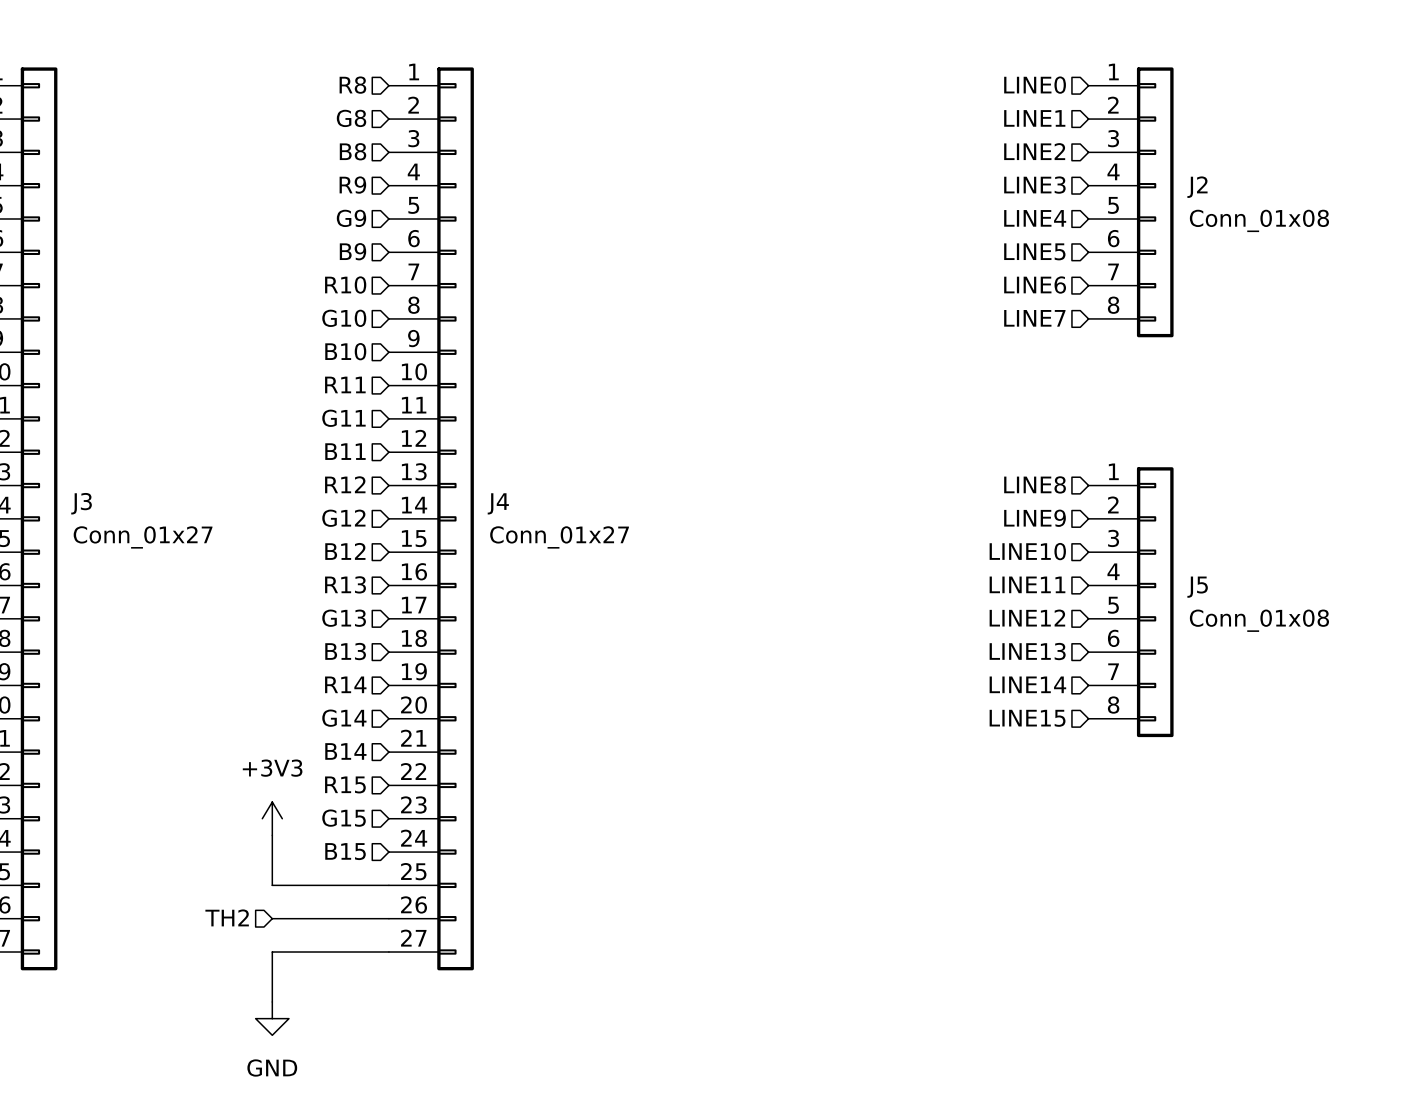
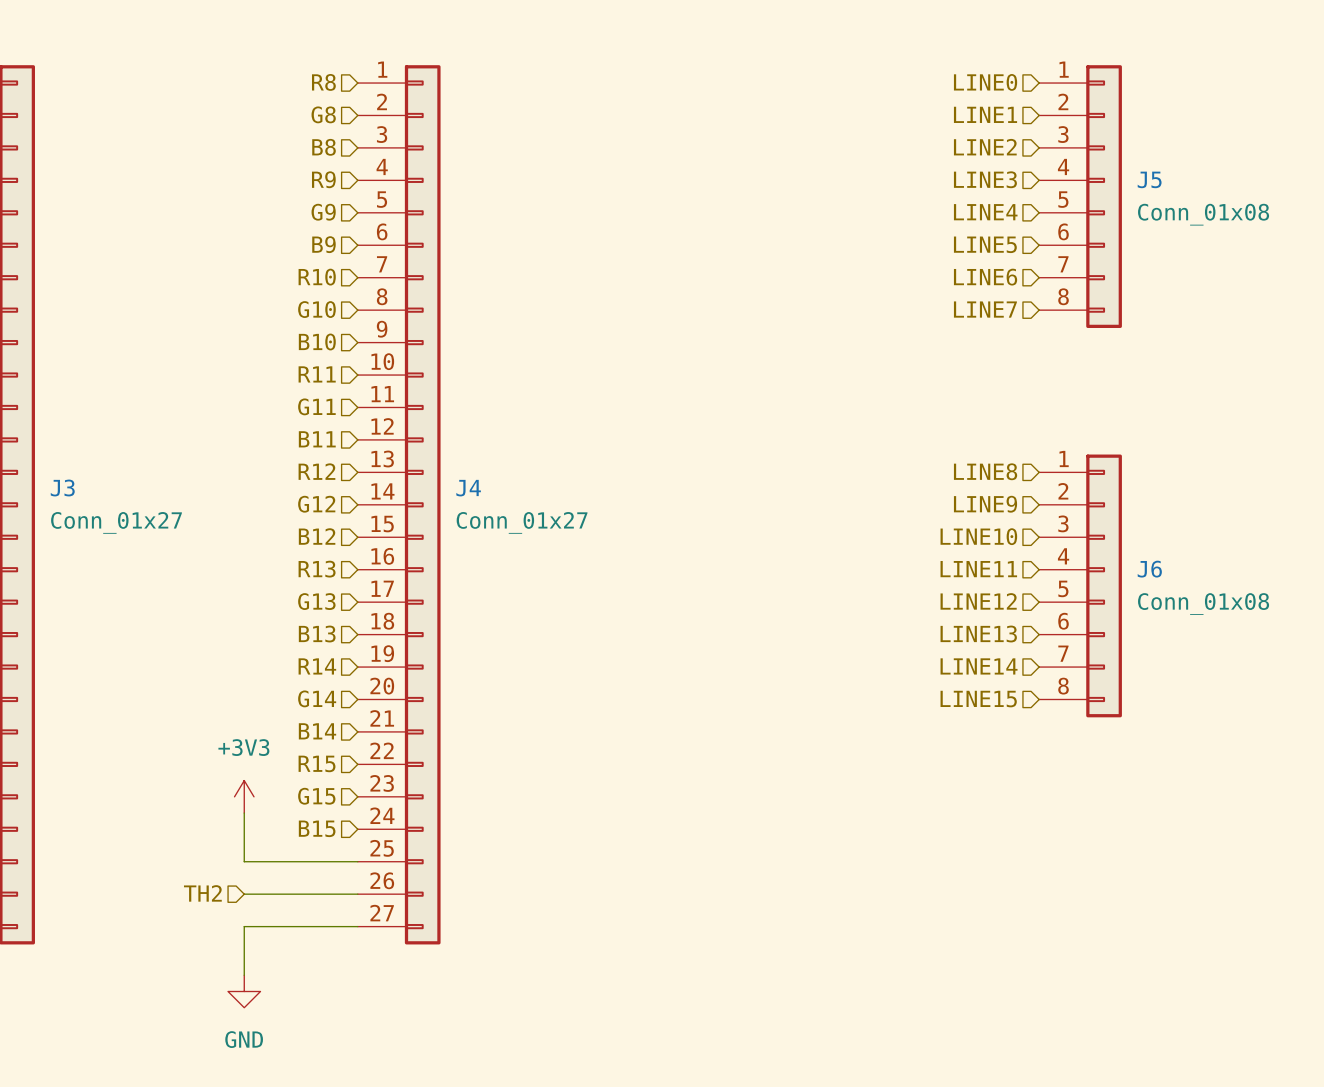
J2 name: J2 (1197, 187) -> J5 (1149, 179)
J5 name: J5 (1197, 587) -> J6 (1149, 569)

